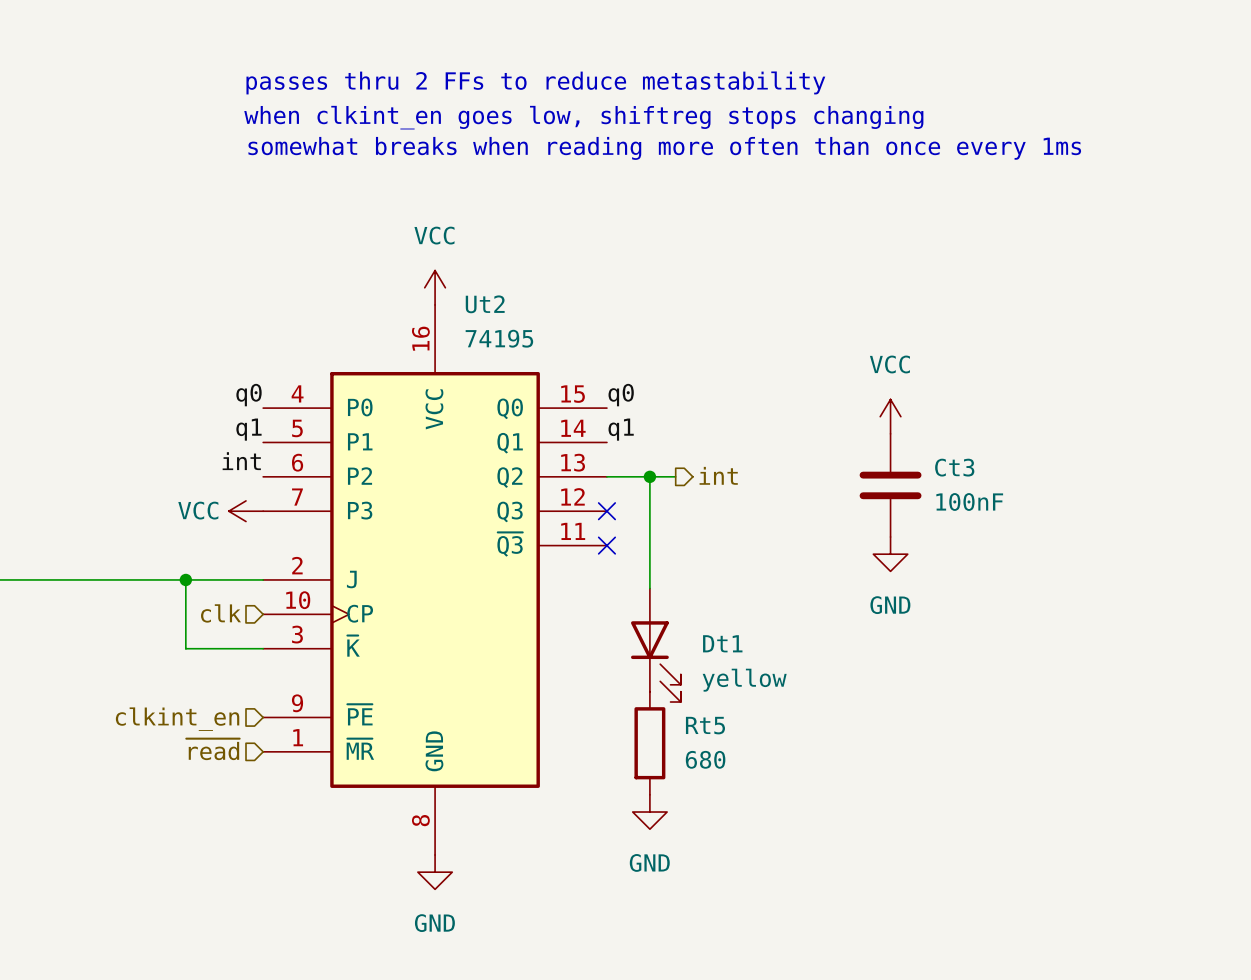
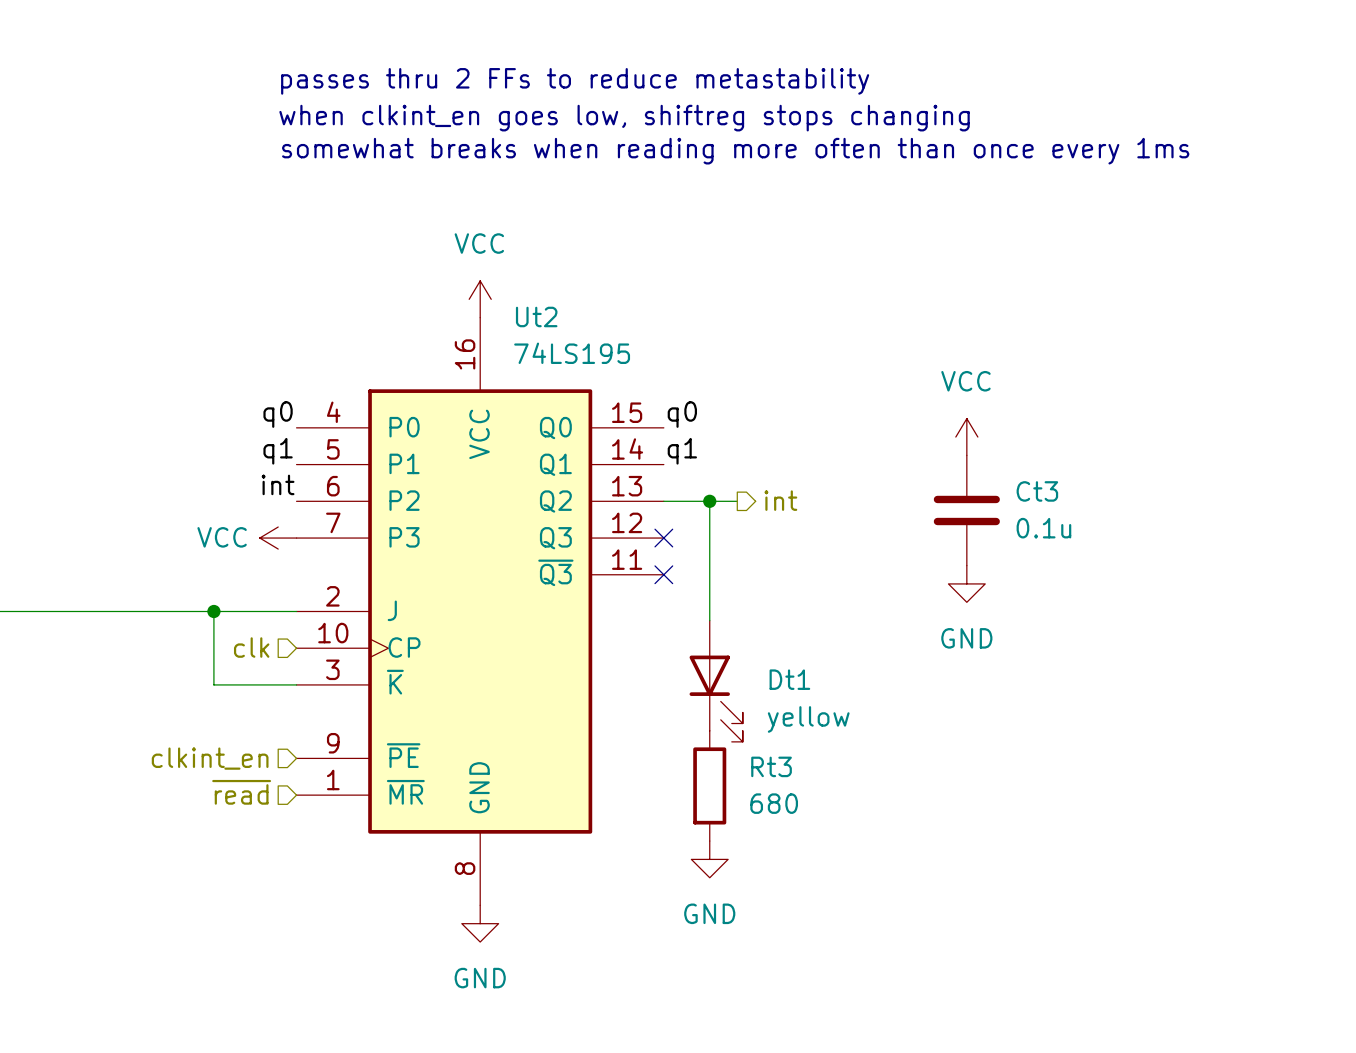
Ut2 value: 74195 (499, 338) -> 74LS195 (572, 353)
Ct3 value: 100nF (969, 501) -> 0.1u (1043, 528)
Rt5 name: Rt5 (705, 725) -> Rt3 (771, 766)

